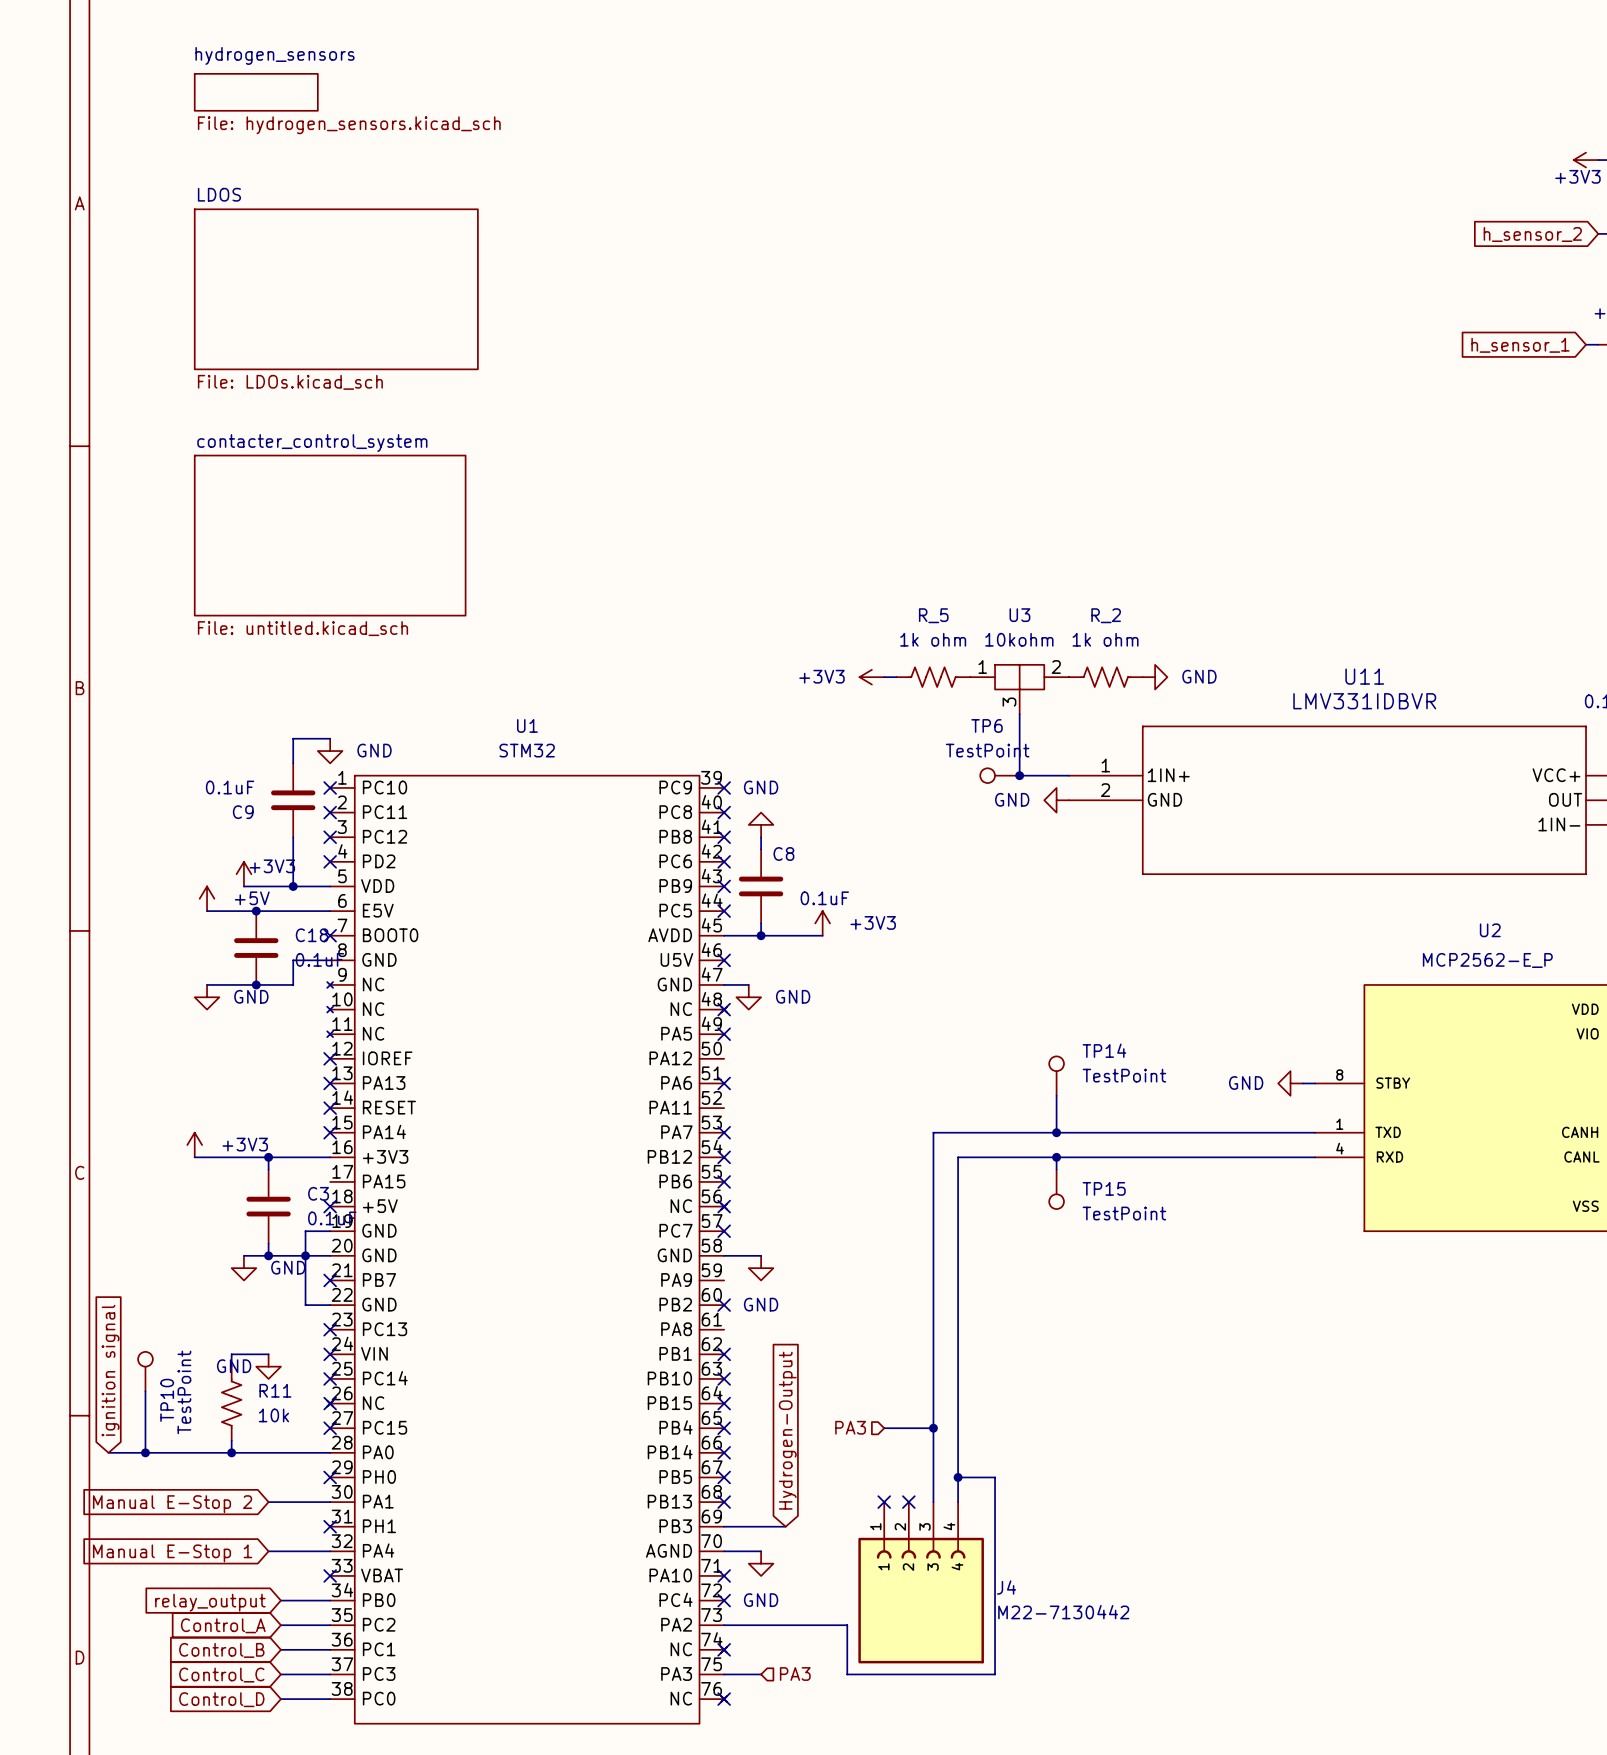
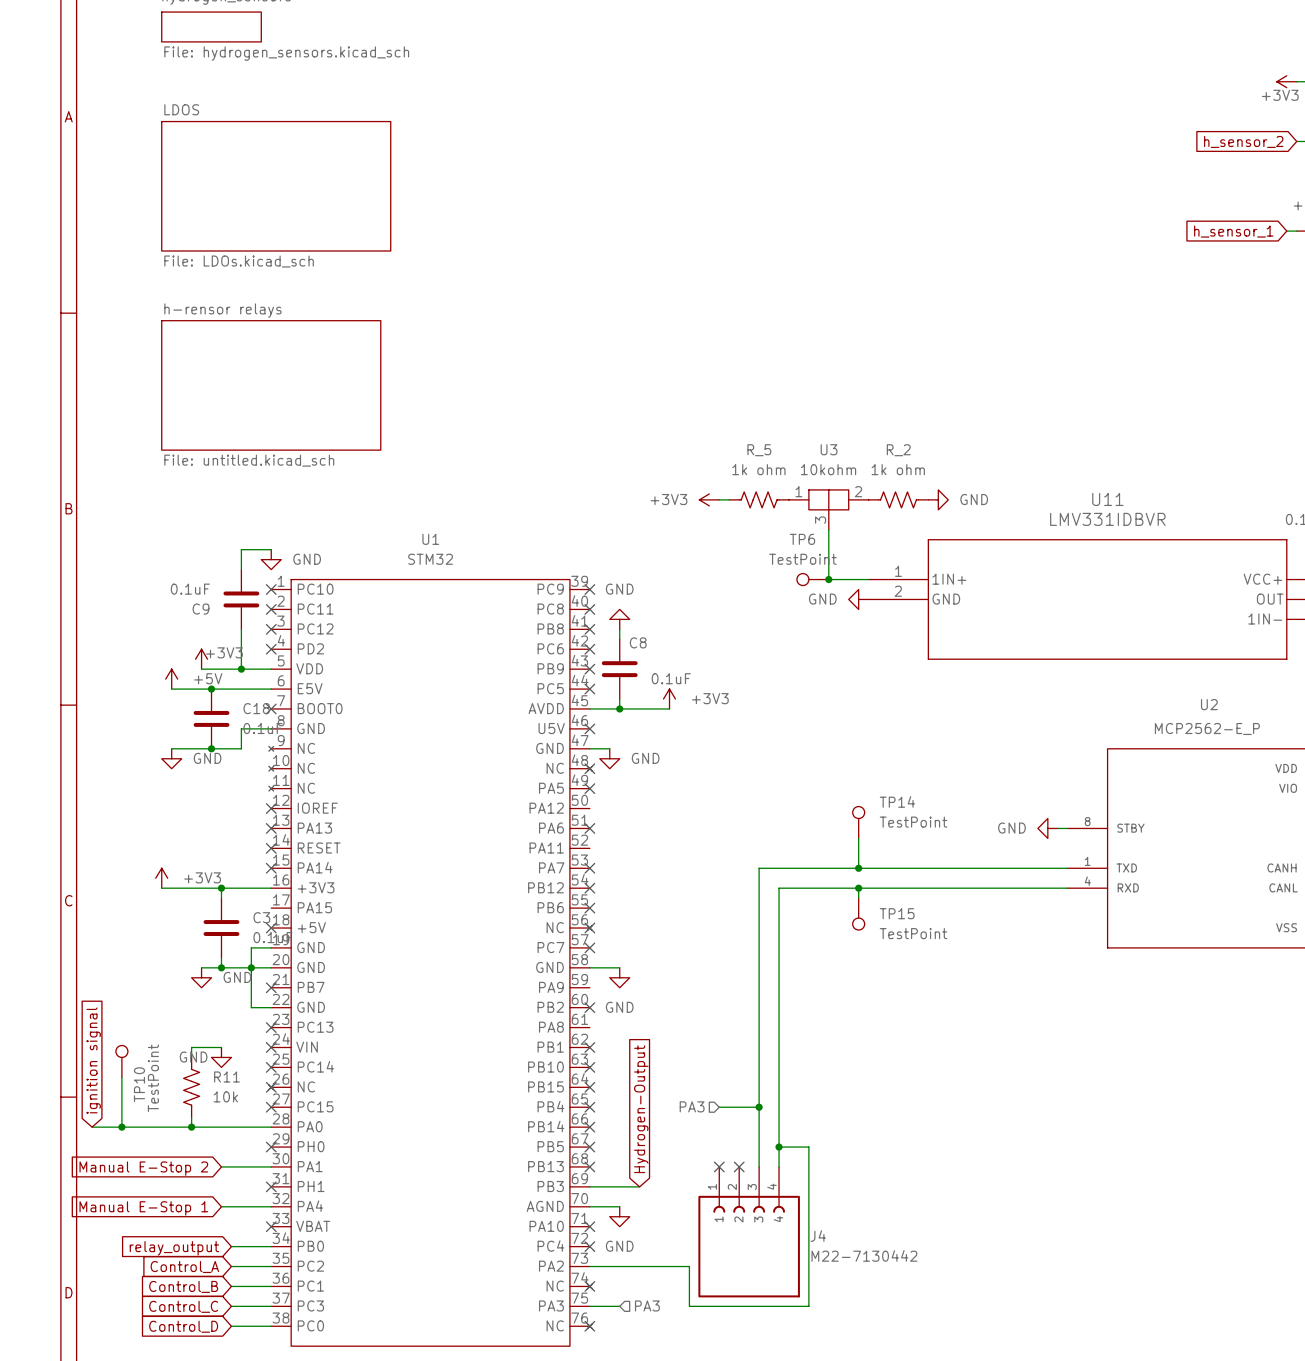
sheet contacter_control_system name: contacter_control_system (312, 443) -> h-rensor relays (222, 310)

